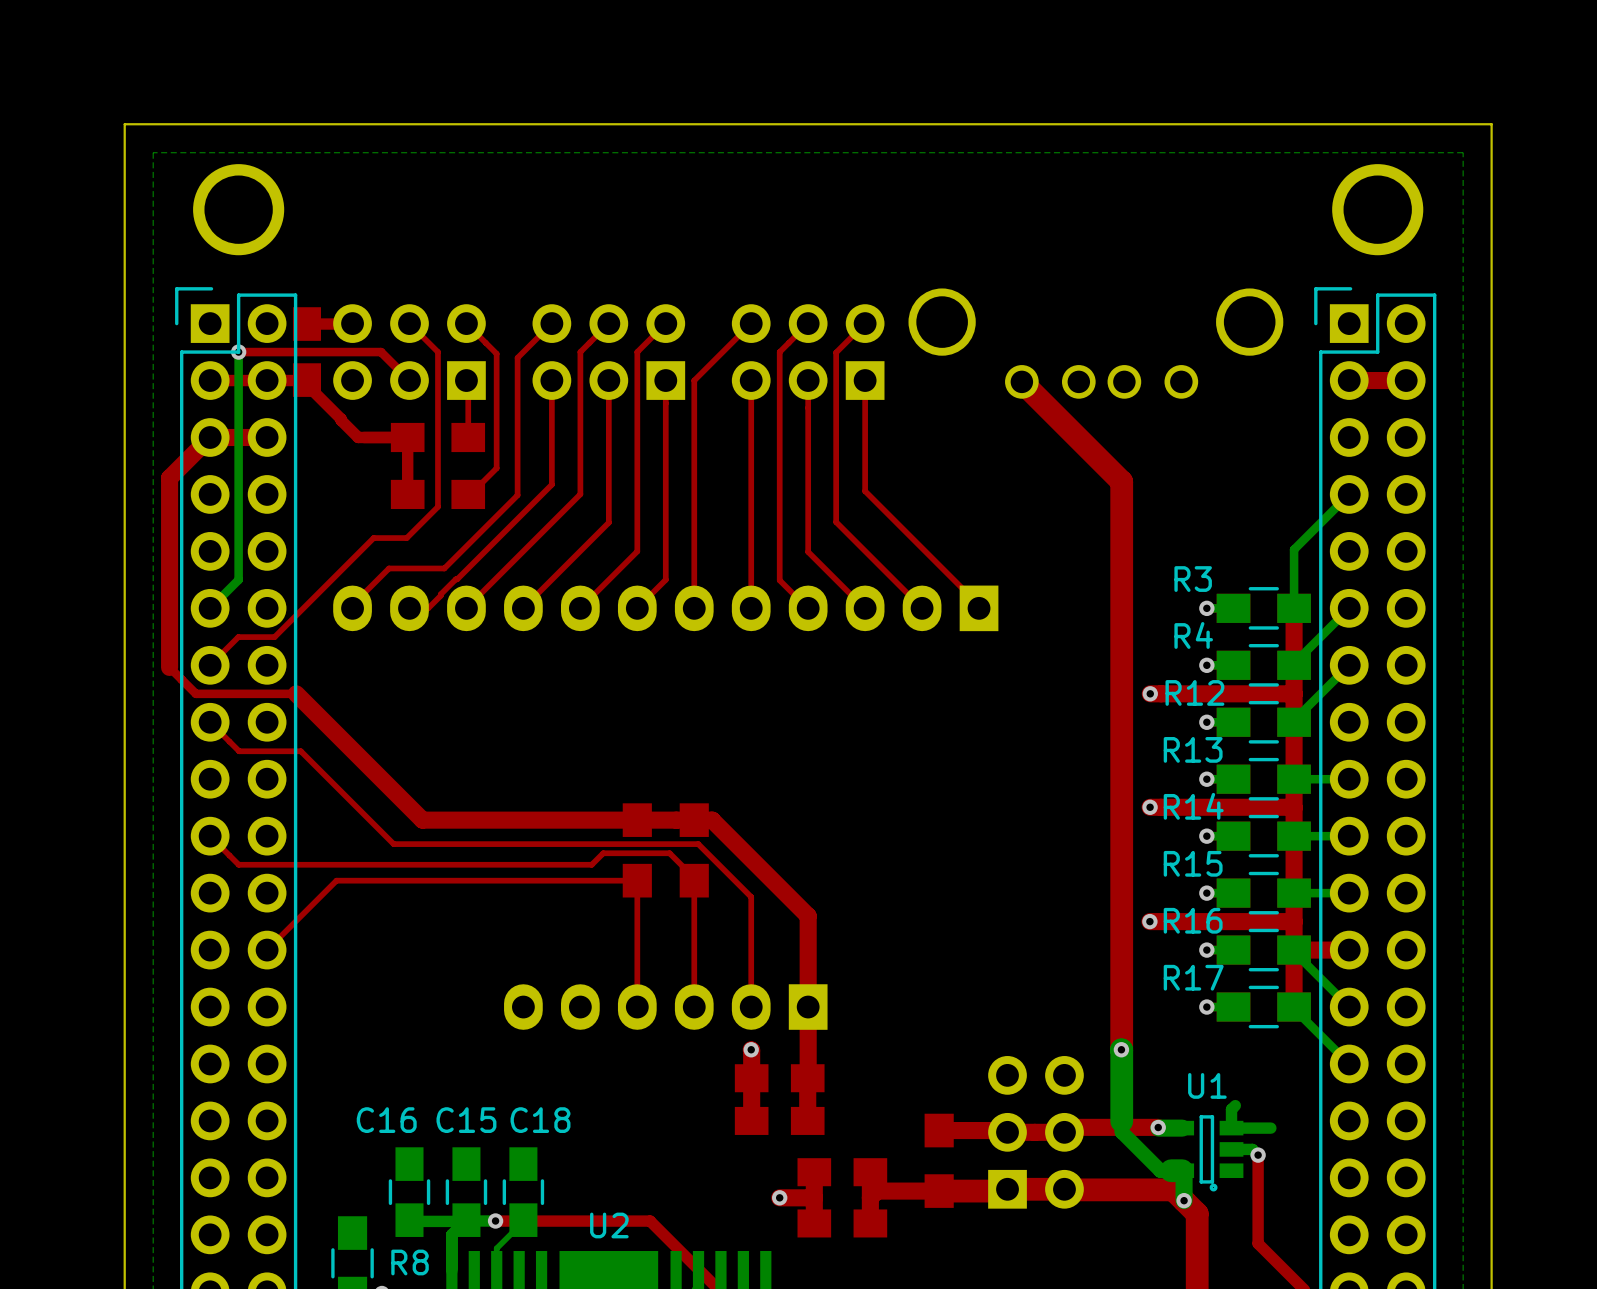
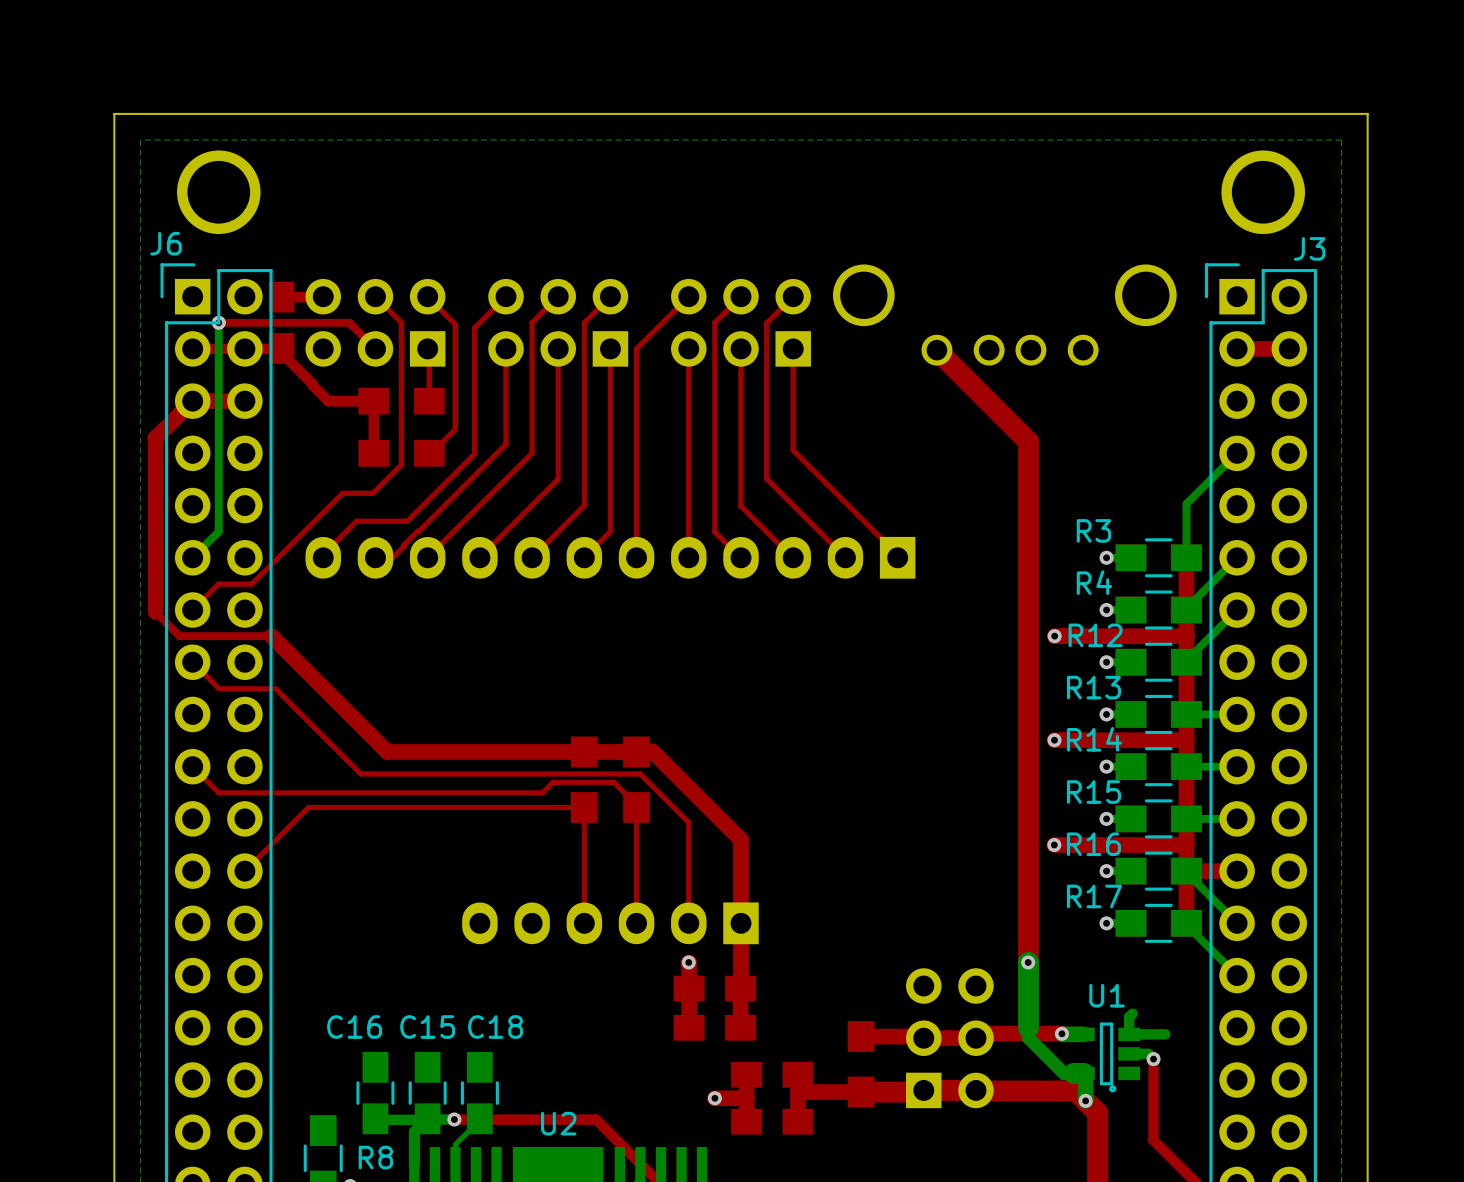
J6 name: none -> J6 (166, 243)
J3 name: none -> J3 (1309, 248)

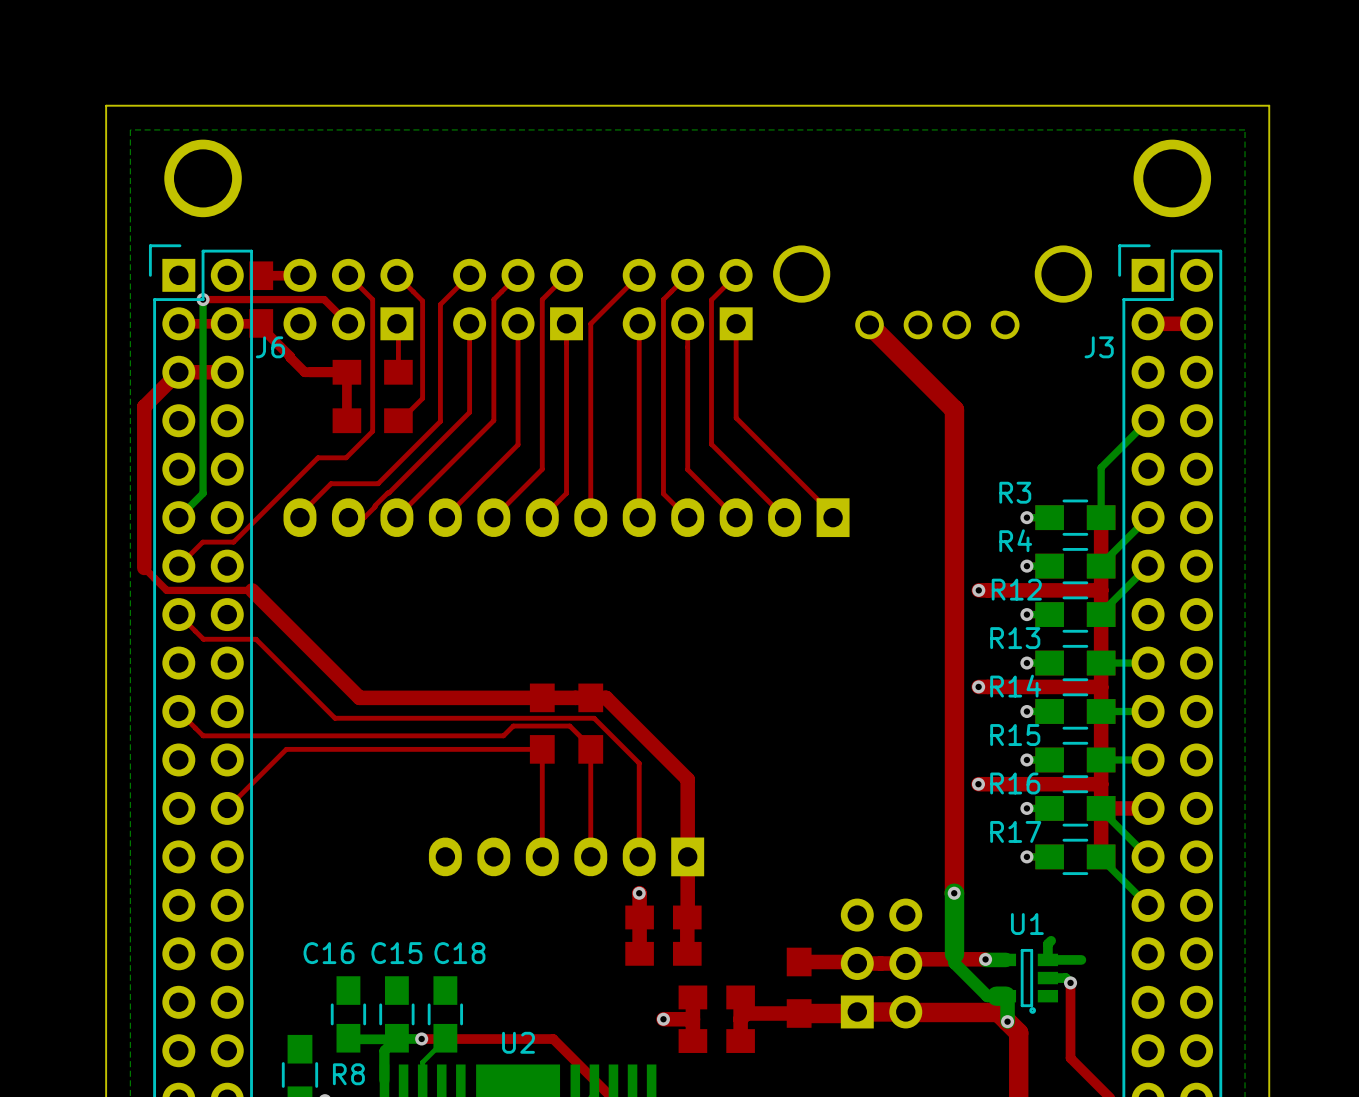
J6 name position: J6 (166, 243) -> J6 (270, 347)
J3 name position: J3 (1309, 248) -> J3 (1099, 347)

